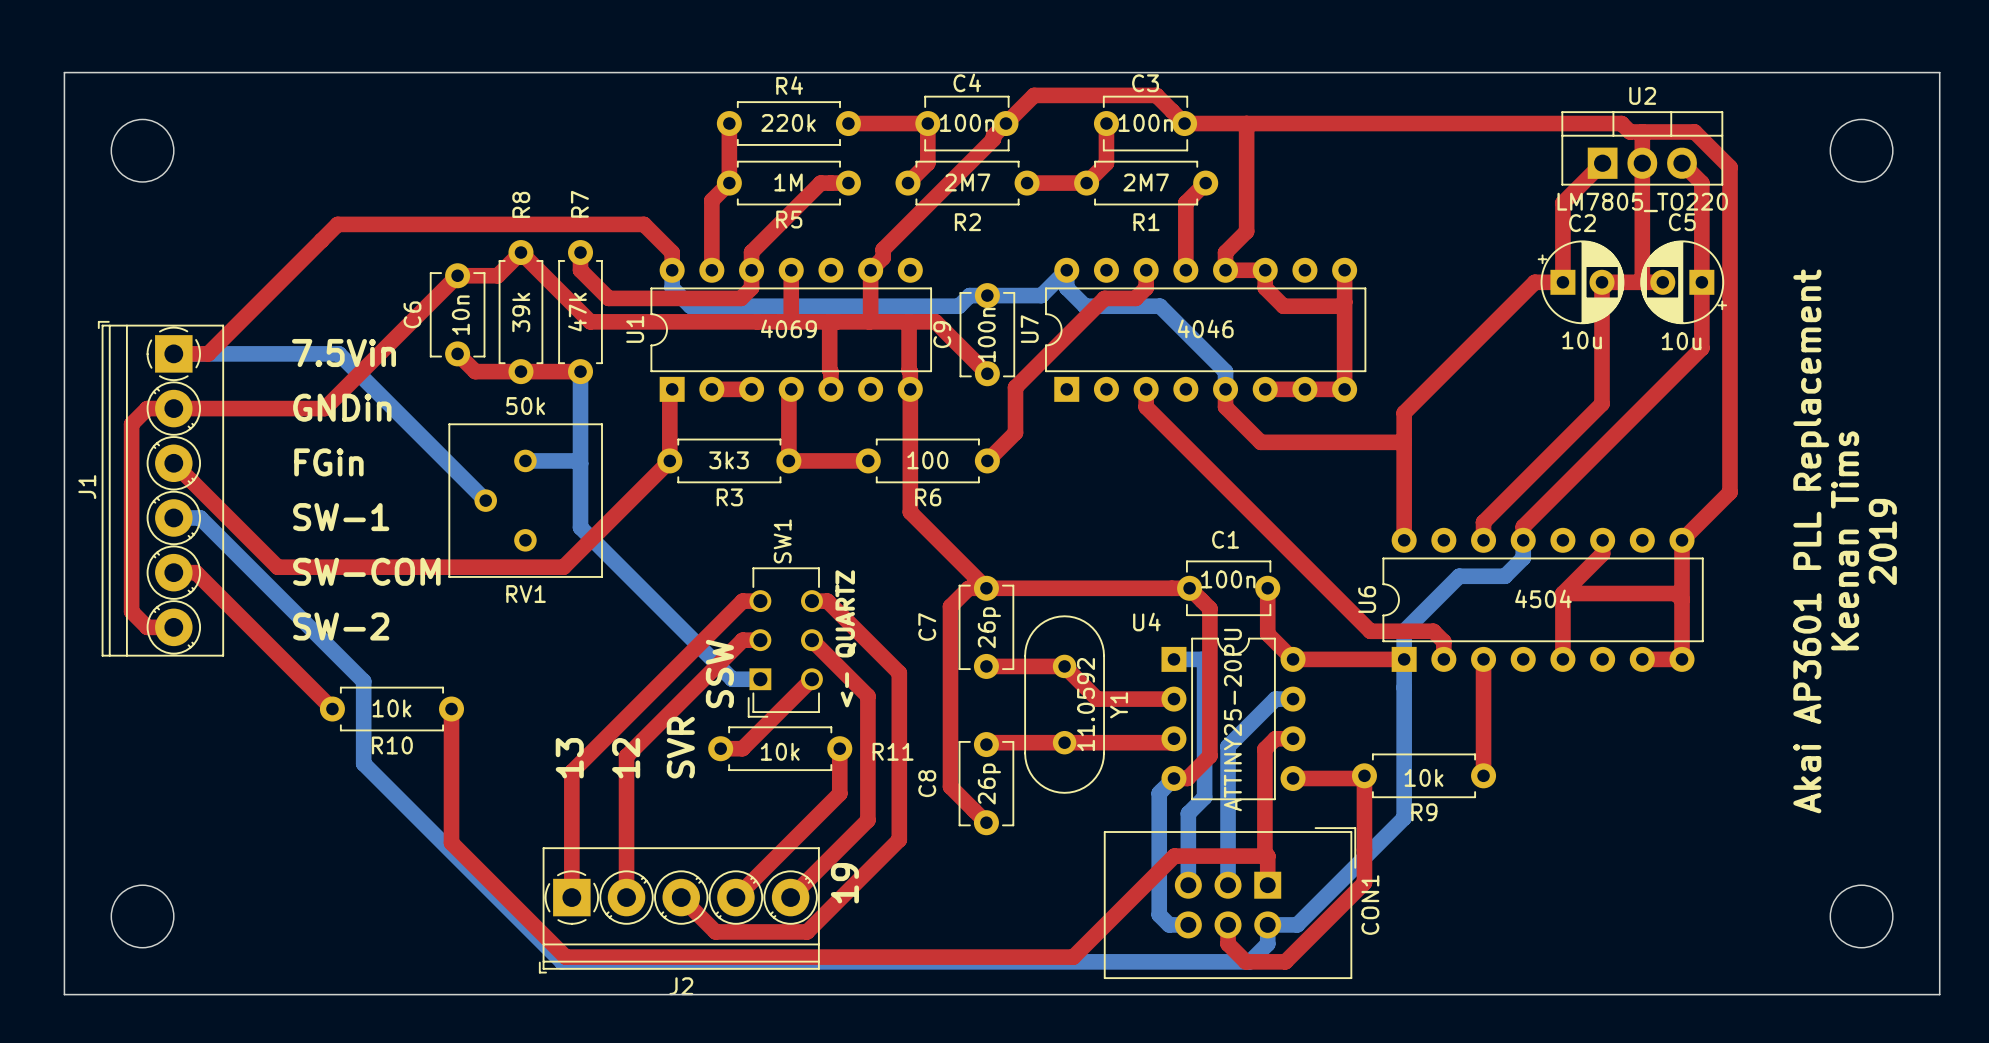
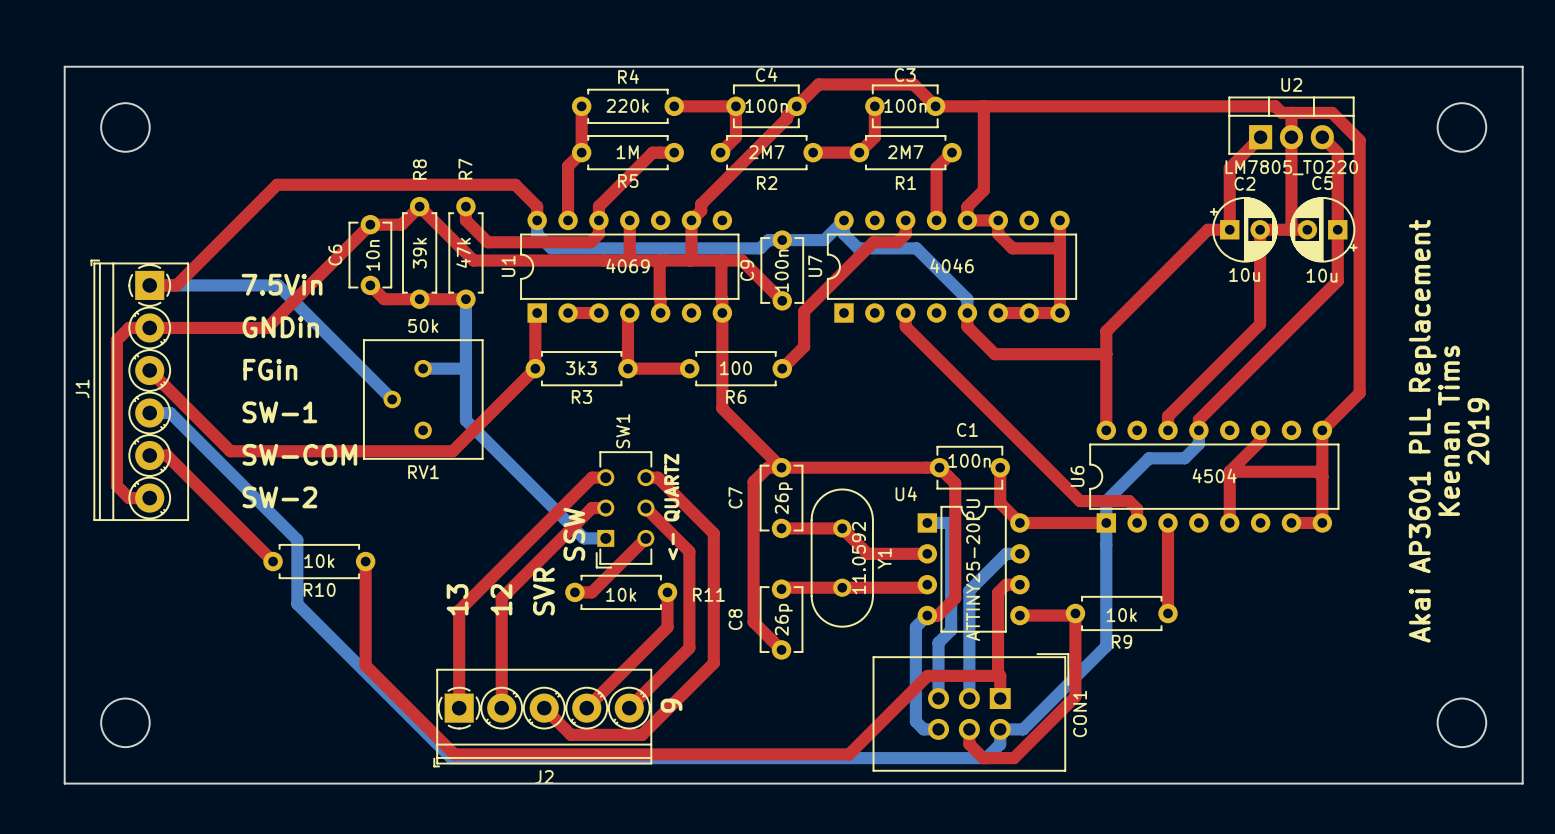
text: 19 (844, 883) -> 9 (671, 705)

